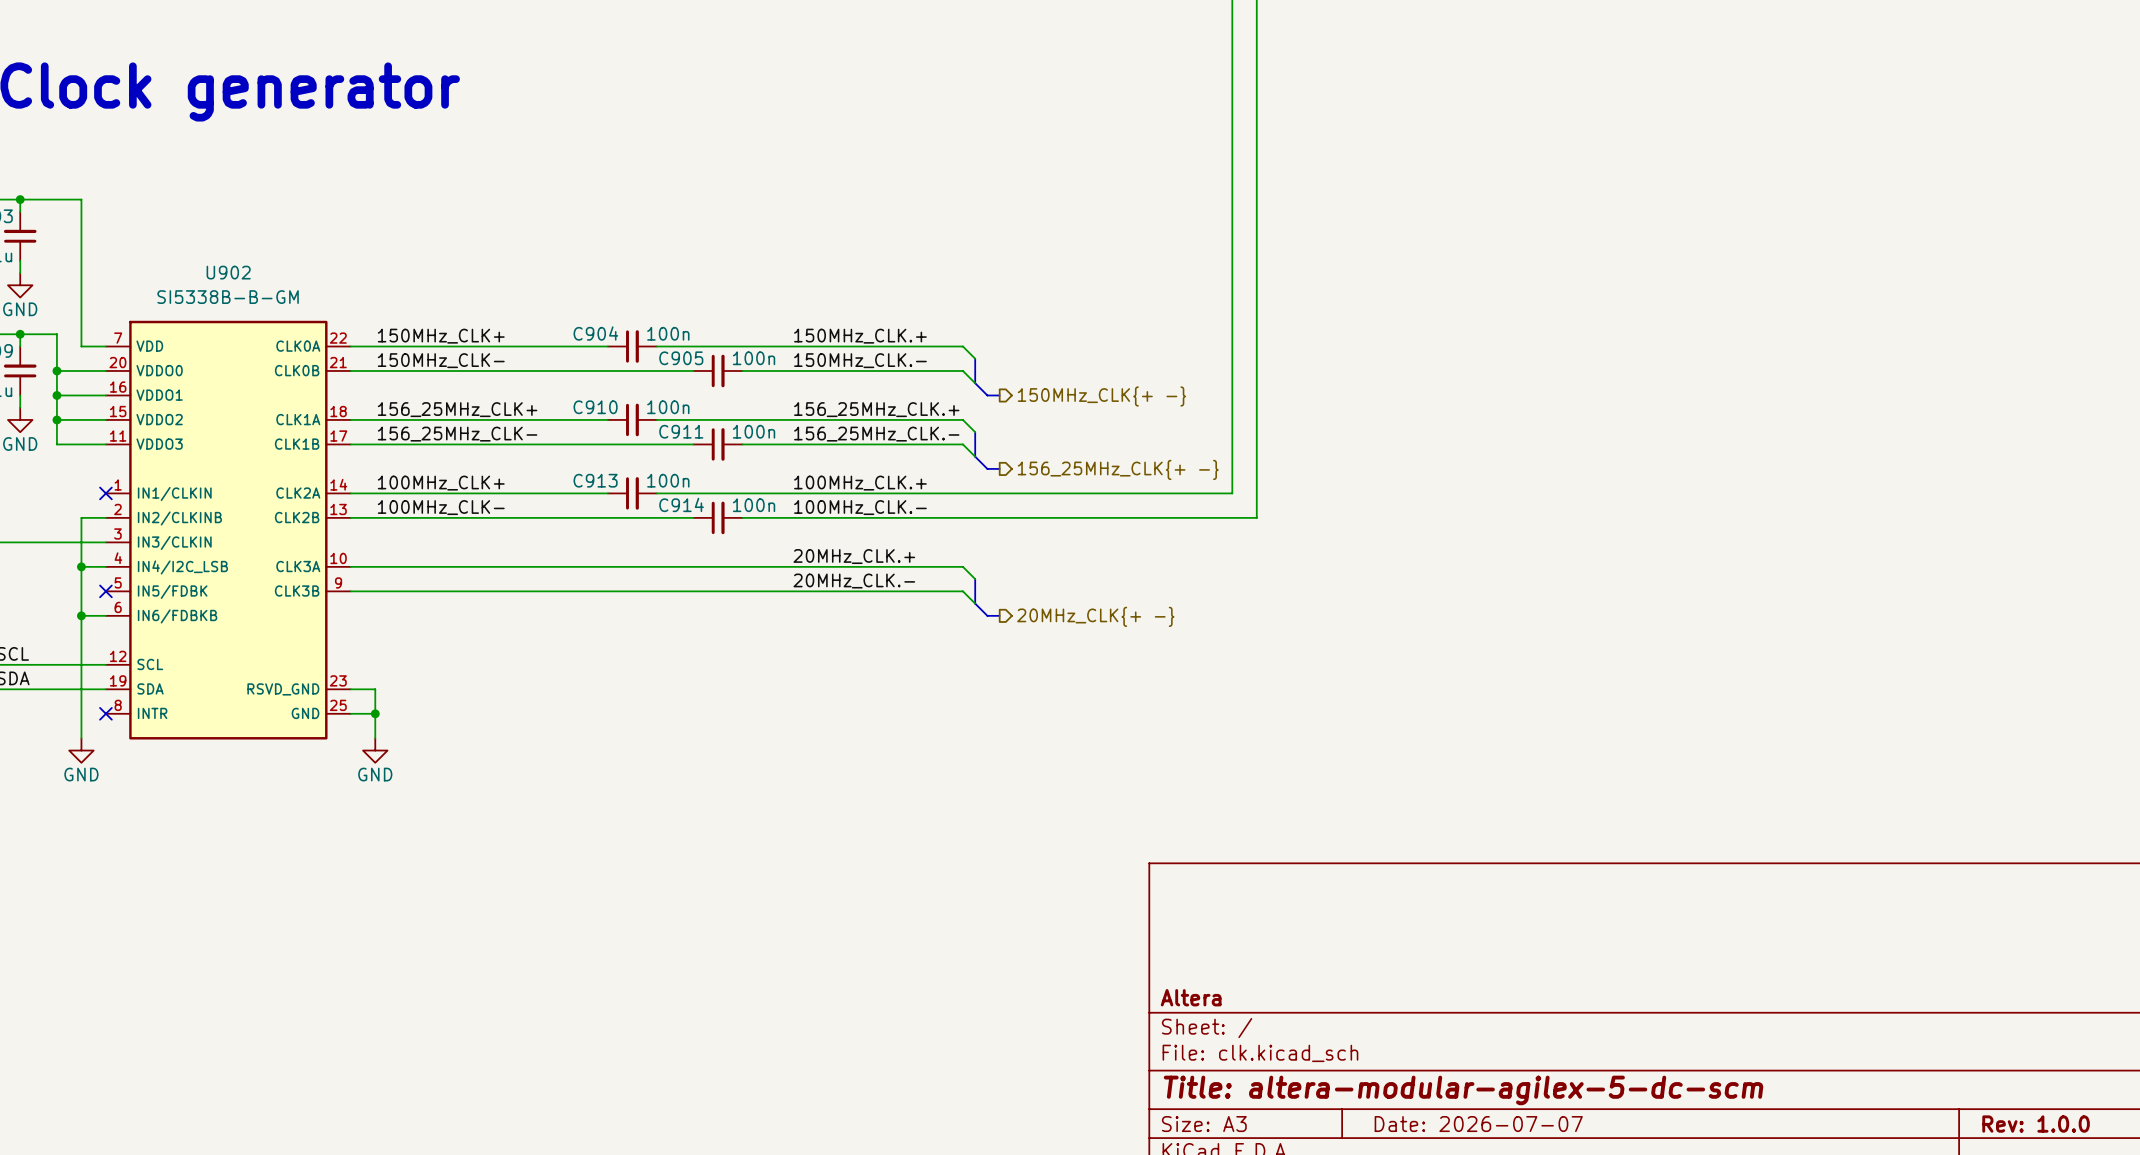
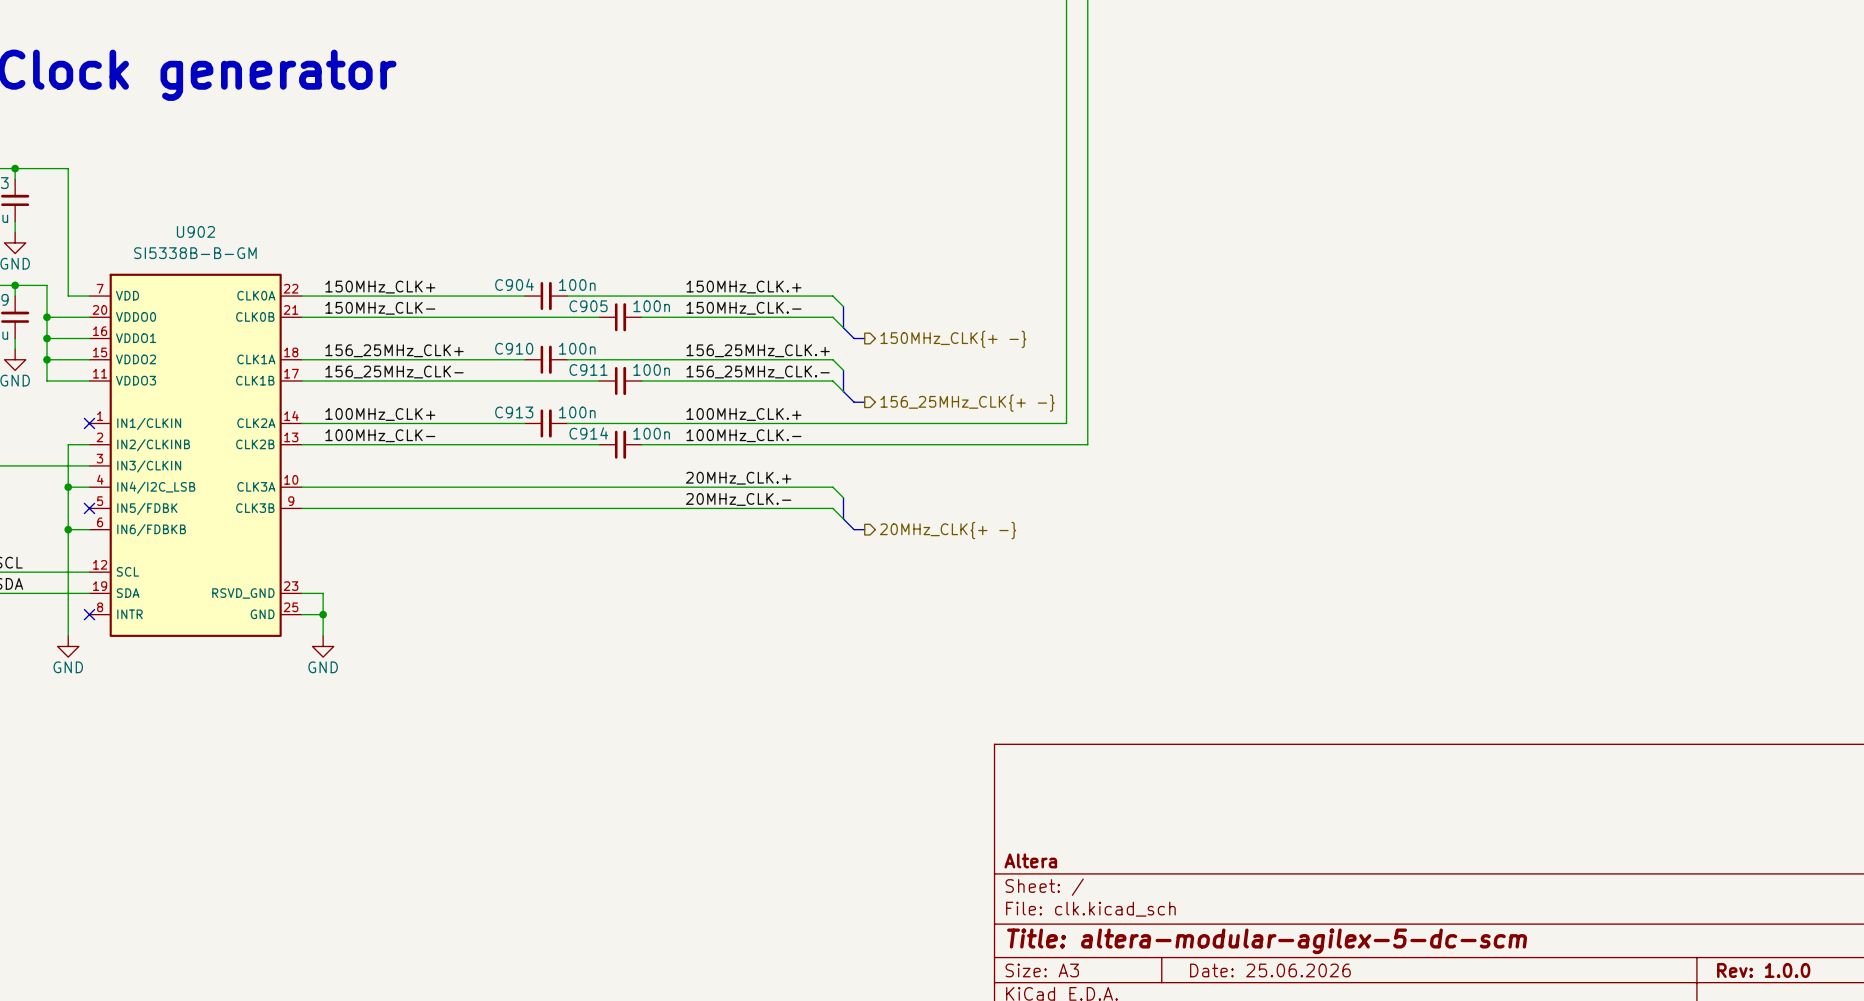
title block: Date: 2026-07-07 (1478, 1124) -> Date: 25.06.2026 (1270, 970)

